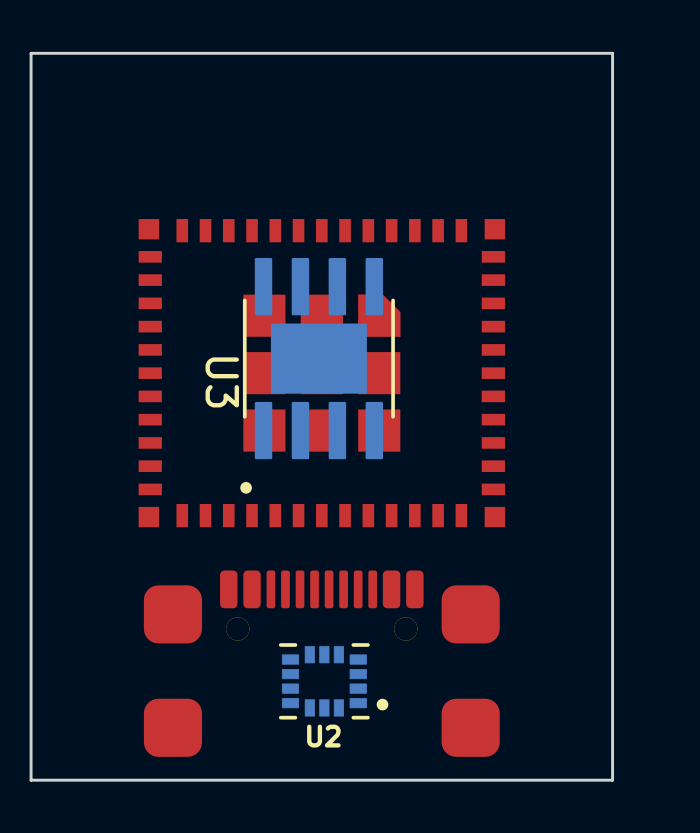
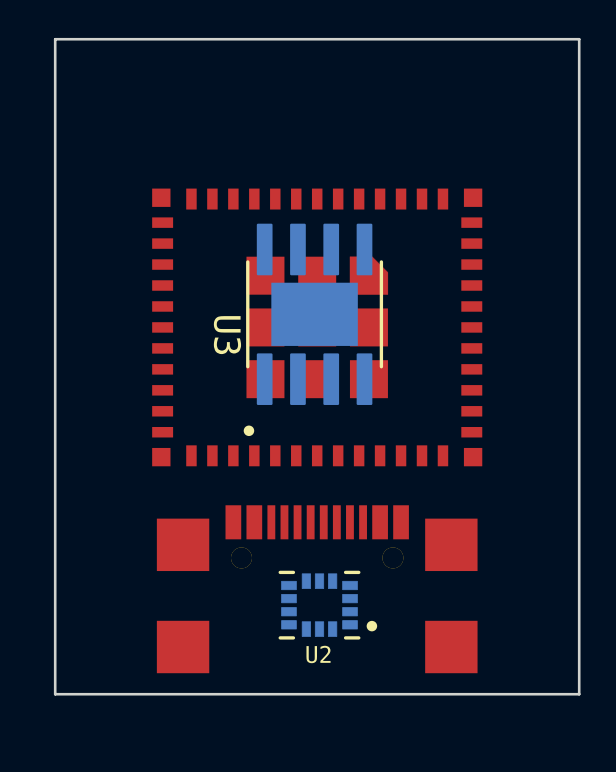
part footprint: [143, 570, 500, 757] -> [156, 505, 478, 674]

